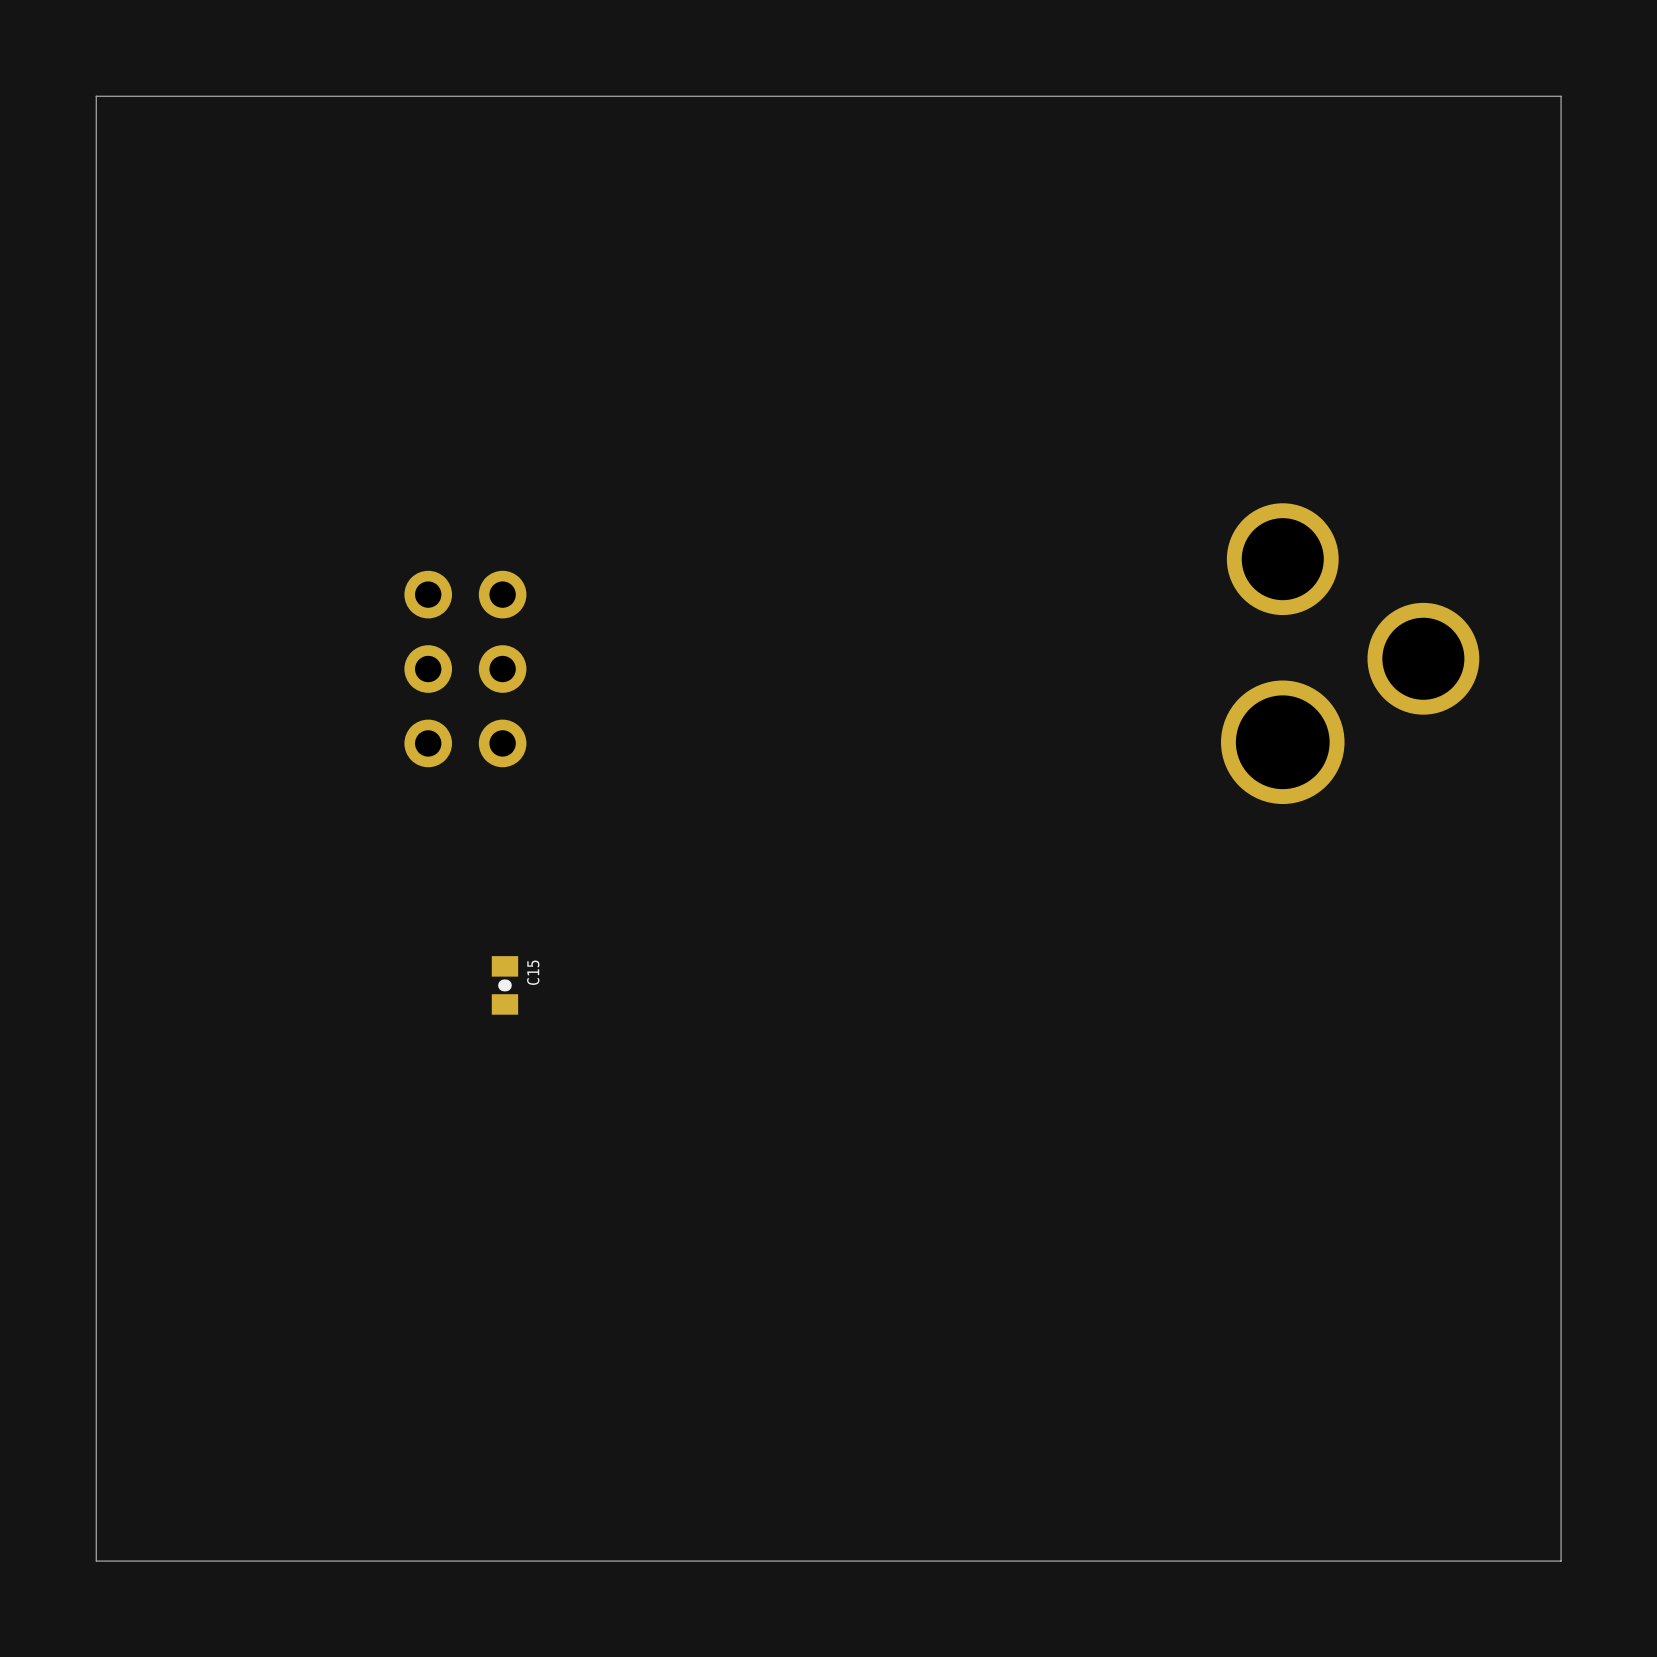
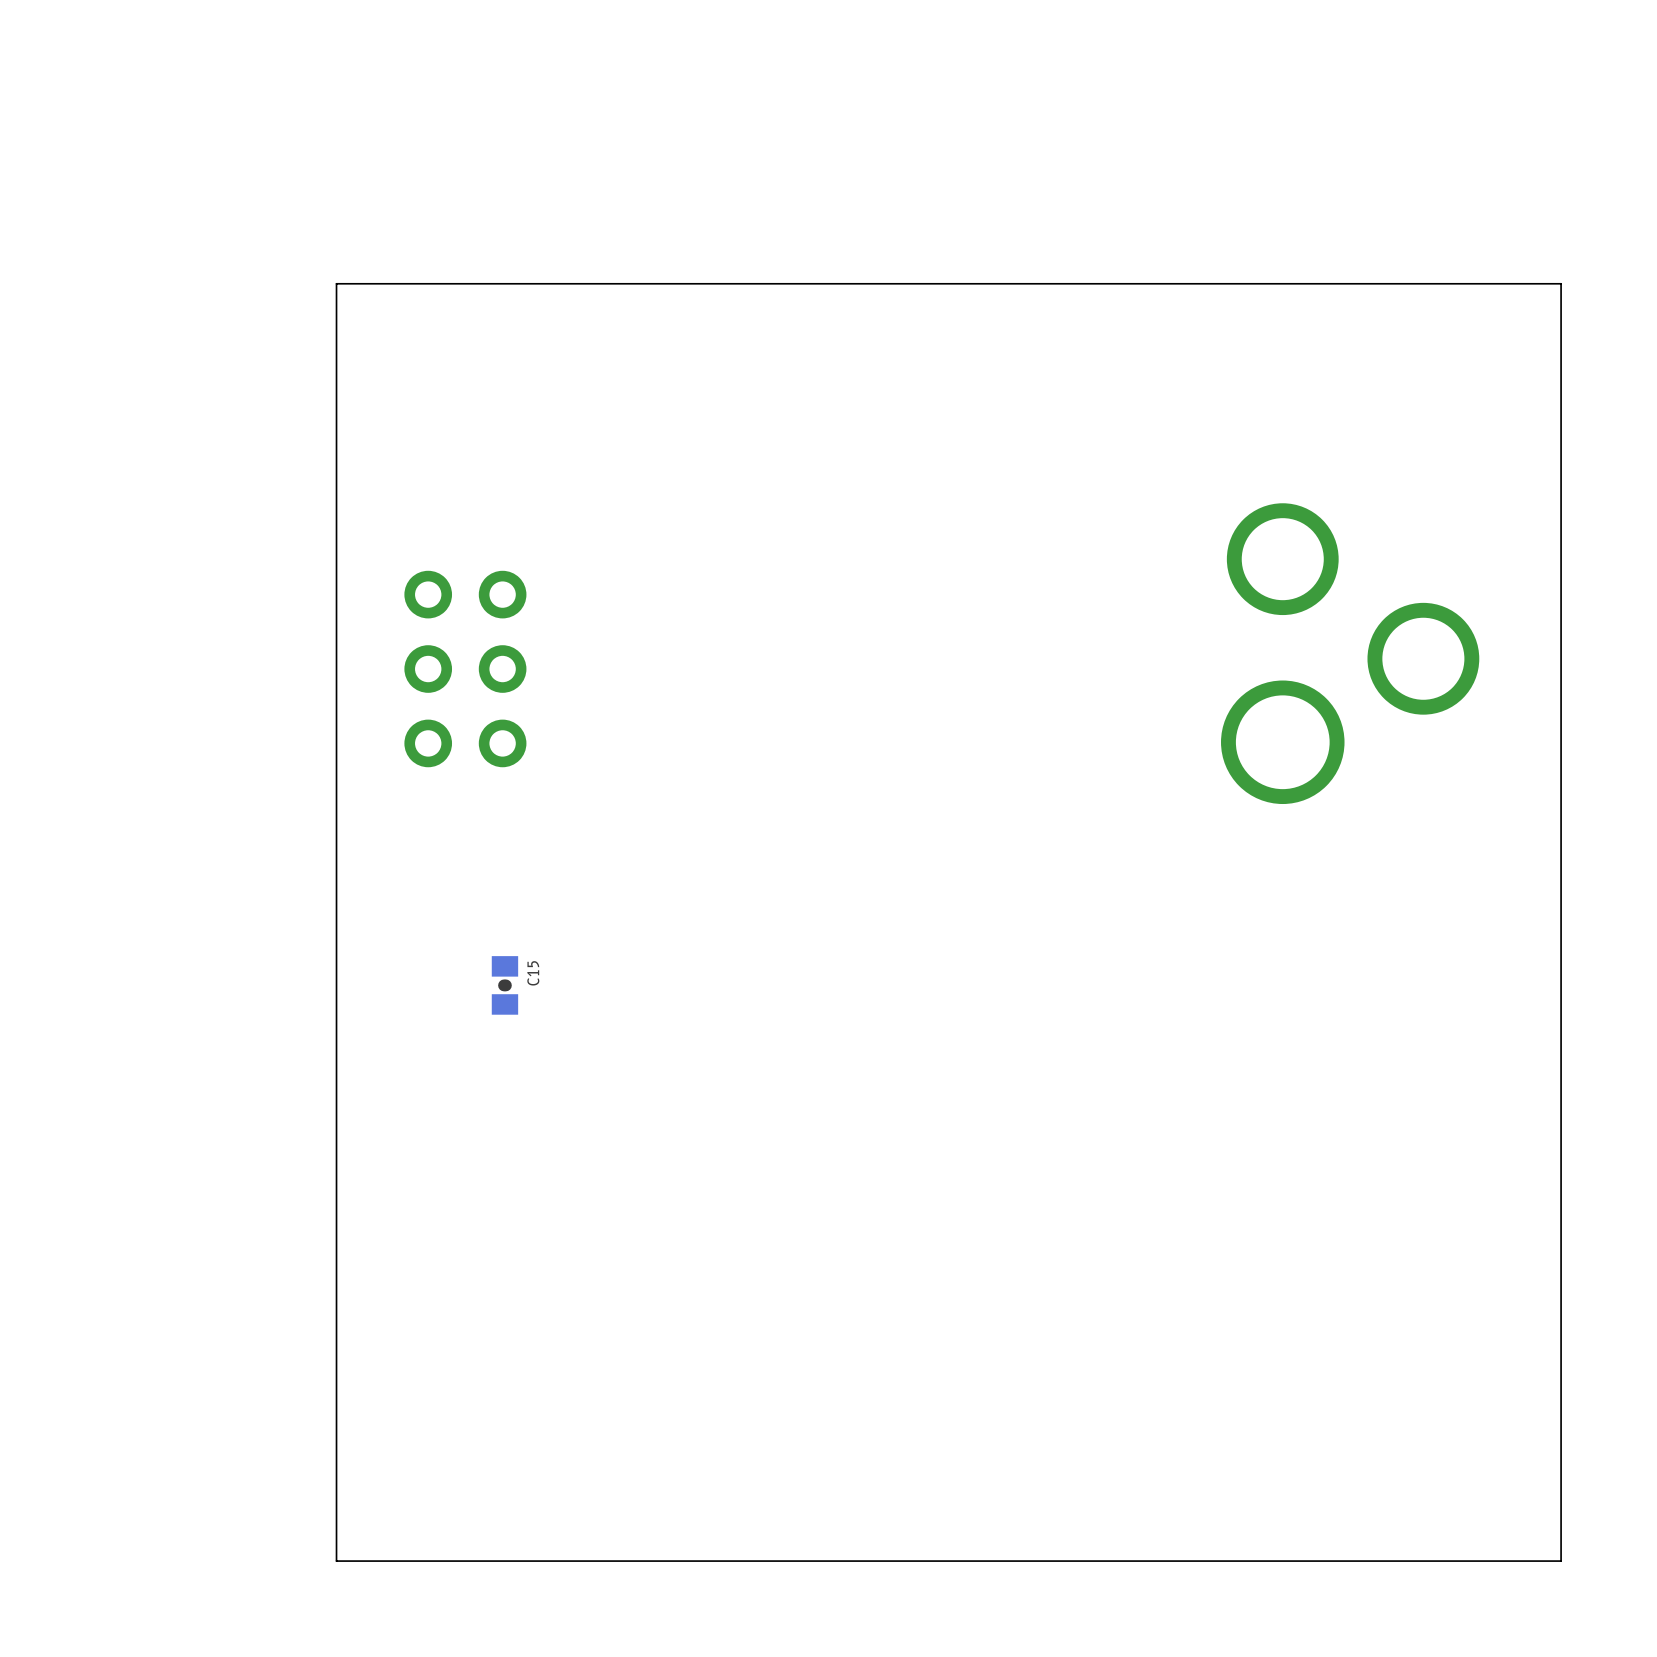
board edge: (1561, 283) (1561, 96) (96, 96) (96, 1561) (336, 1561) -> (1561, 283) (336, 283) (336, 1561)

